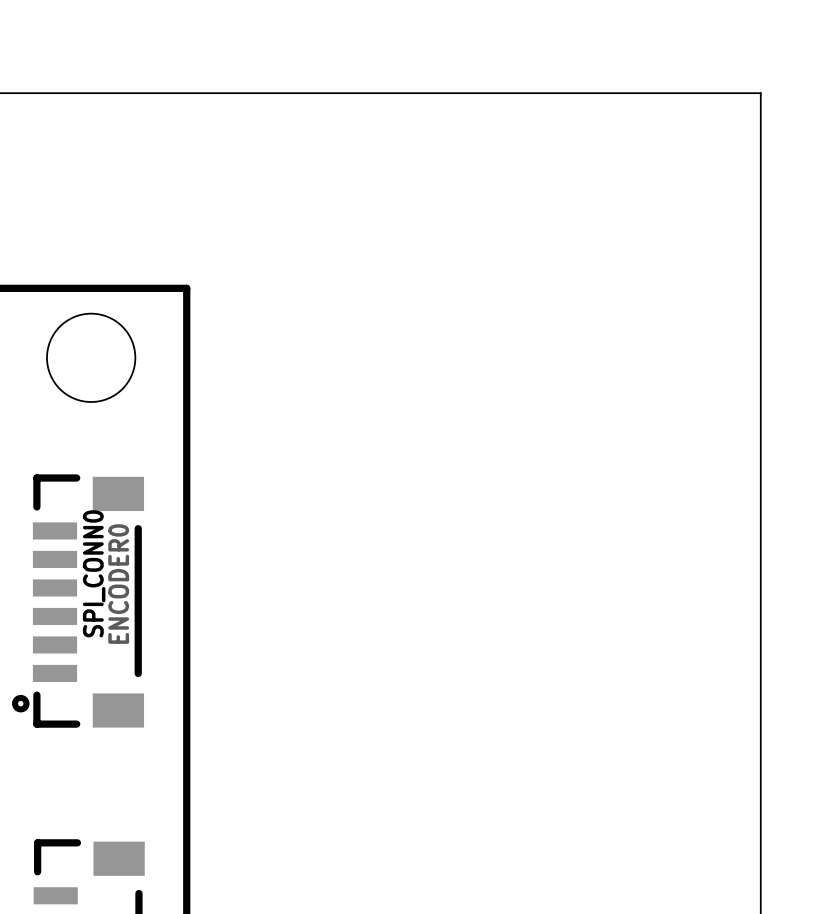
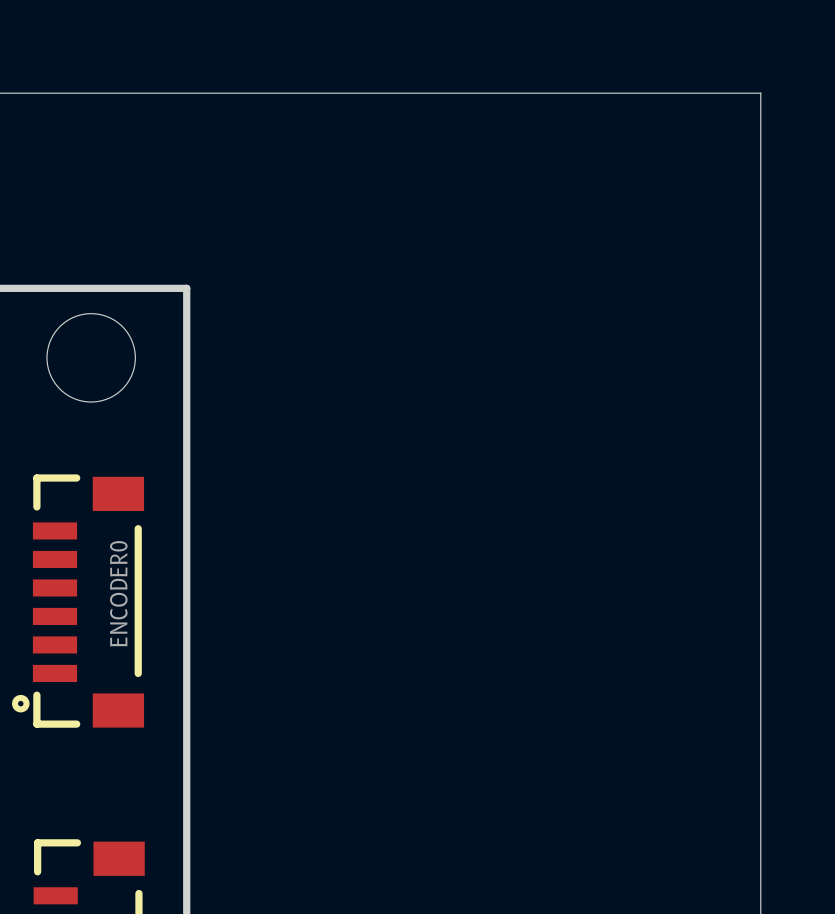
SPI_CONN0 name: SPI_CONN0 (94, 573) -> none

